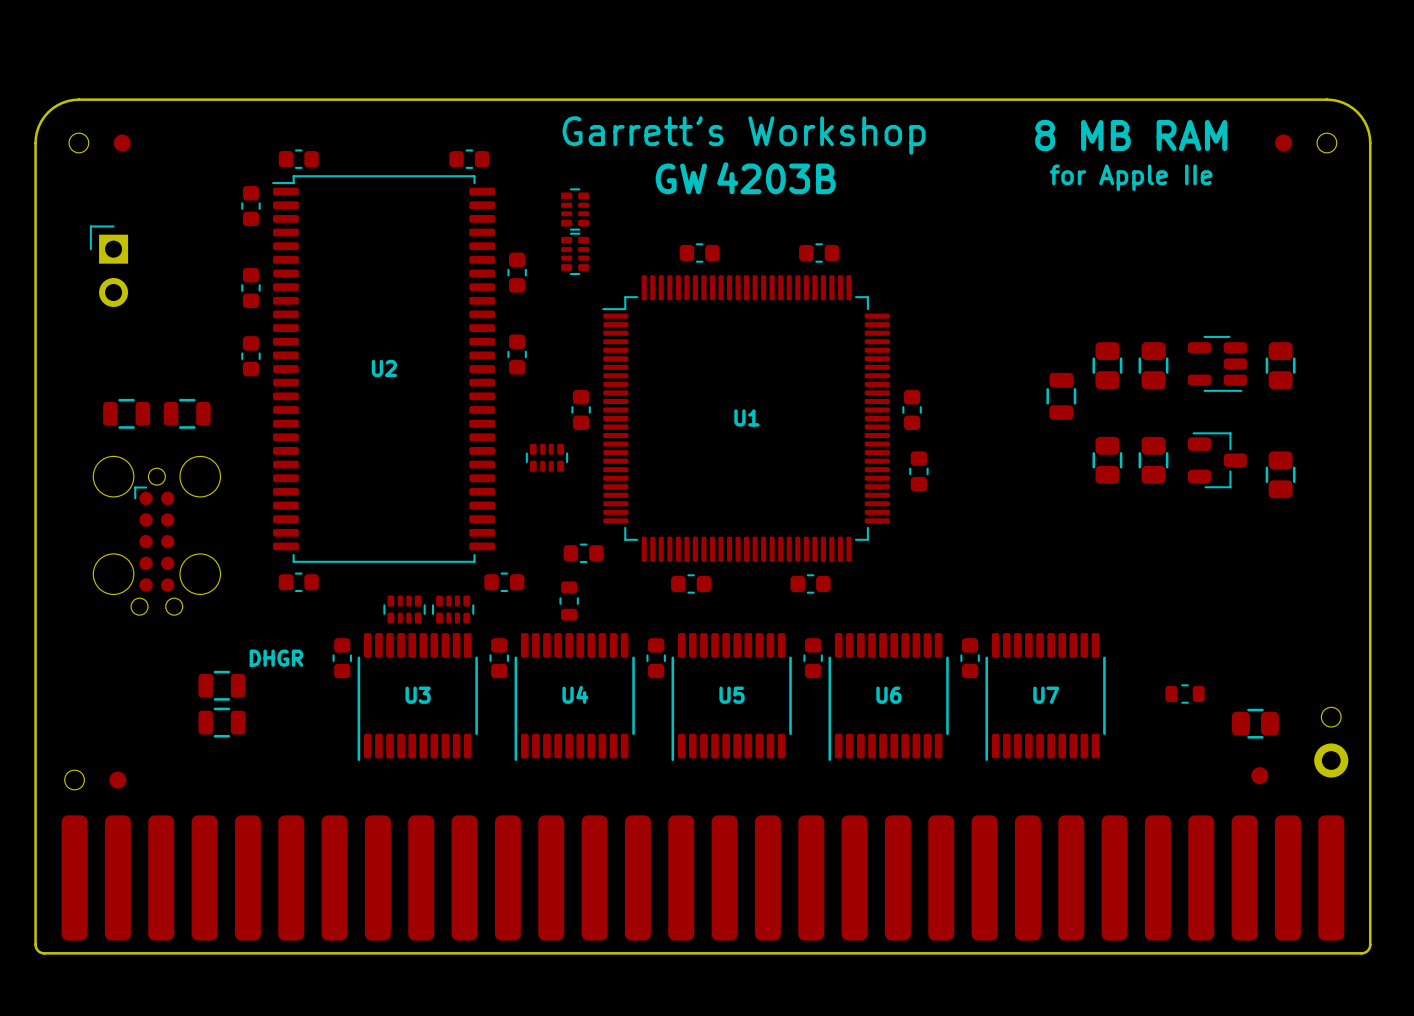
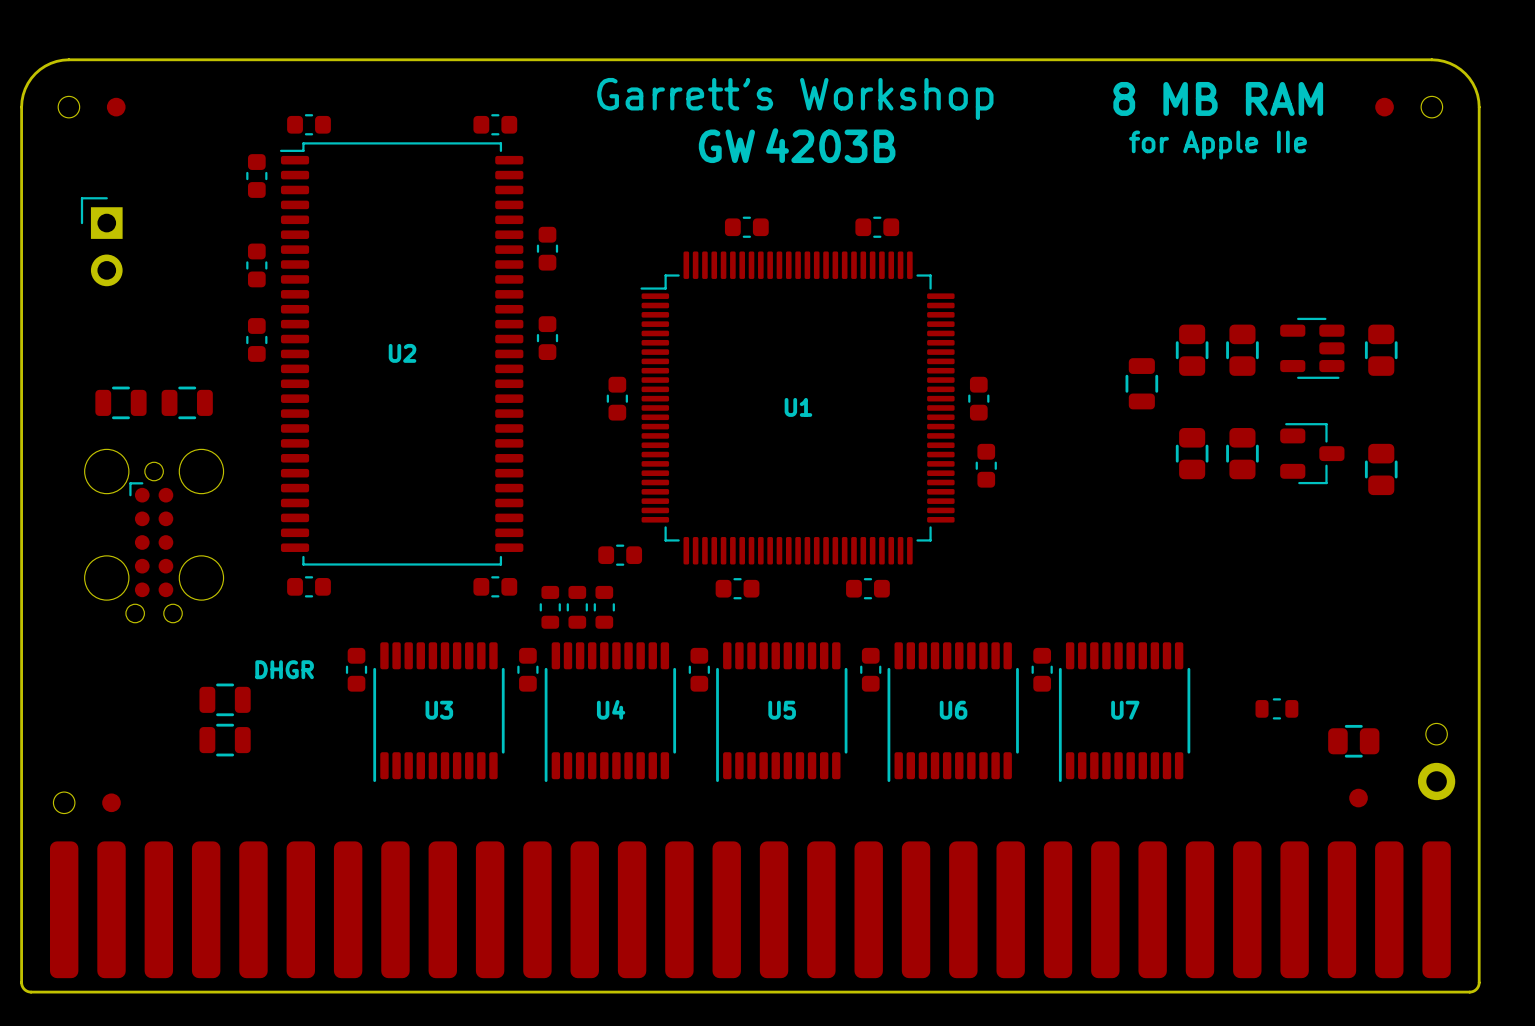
part: (575, 209) -> none
part: (575, 253) -> none
part: (546, 457) -> none
part position: (504, 582) -> (495, 586)
part: none -> (550, 607)
part: none -> (577, 607)
part: (404, 609) -> none
part: (453, 609) -> none

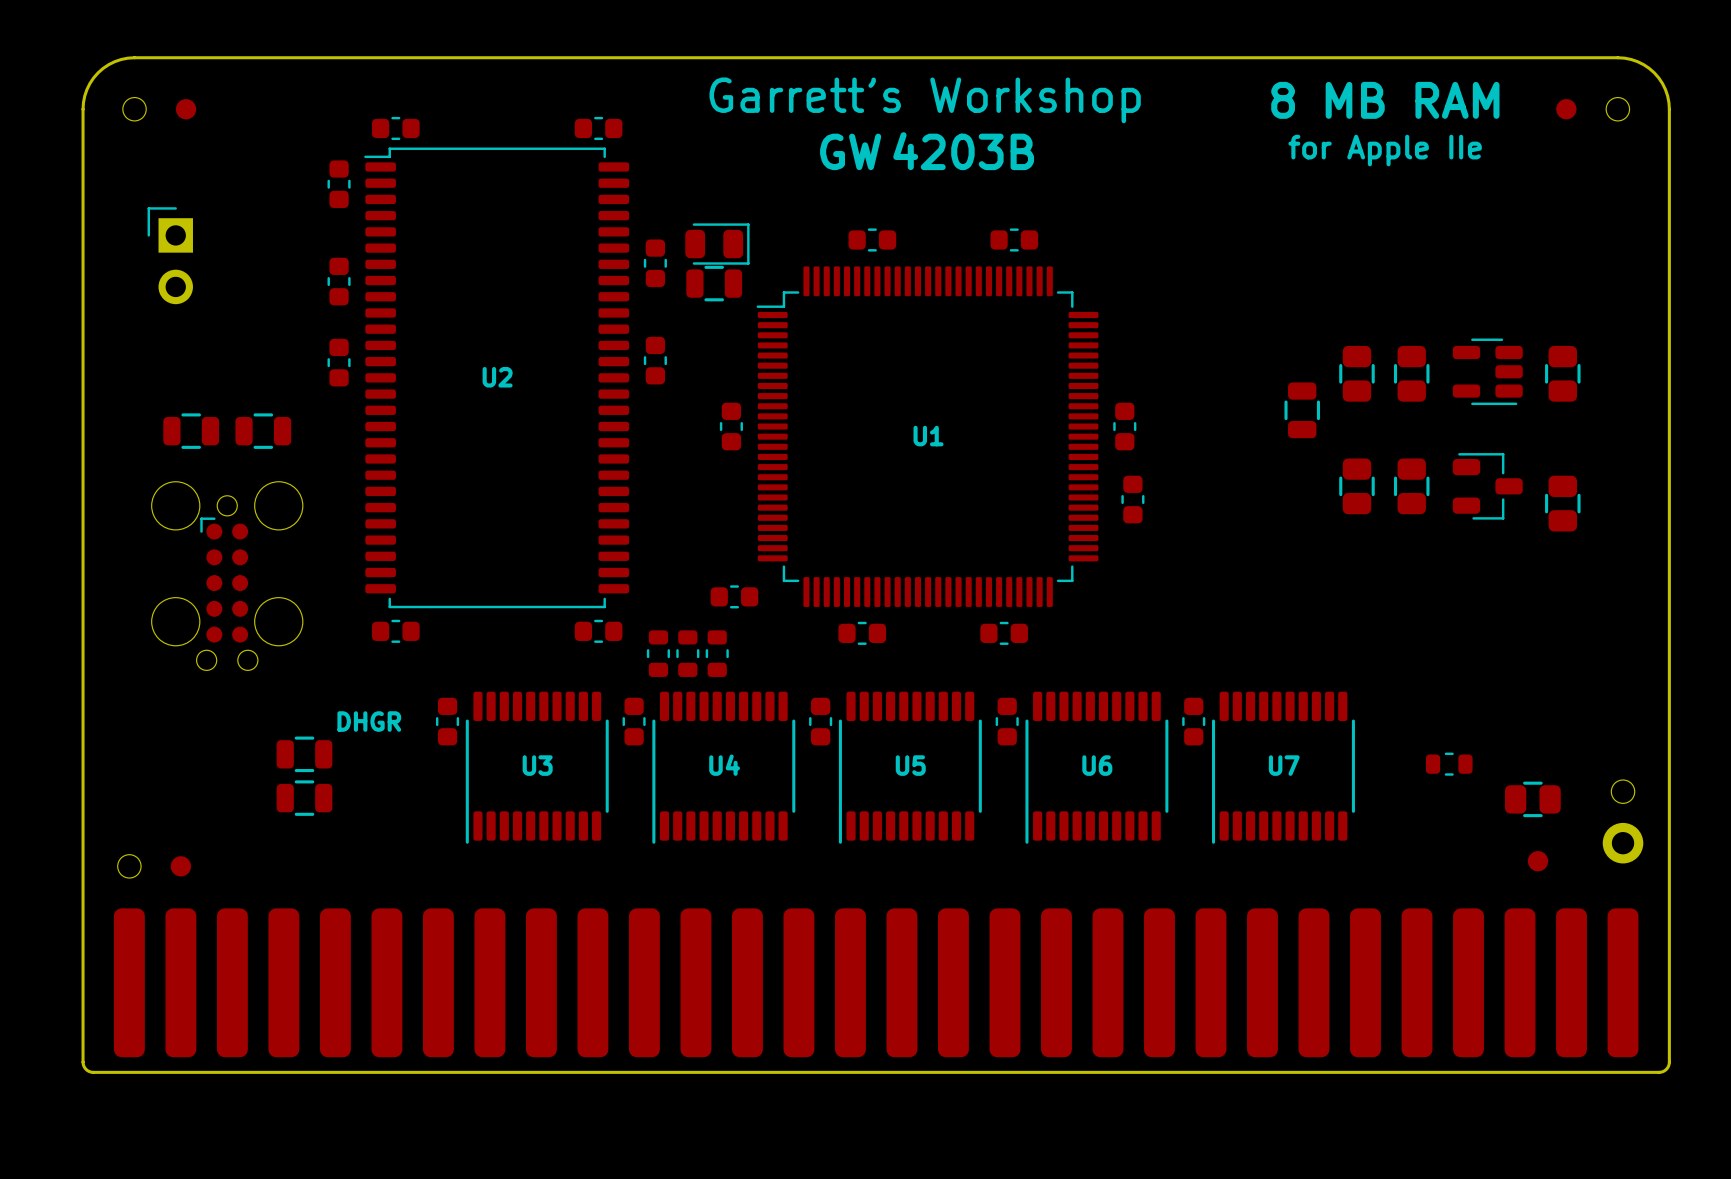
part: none -> (717, 244)
part: none -> (714, 283)

